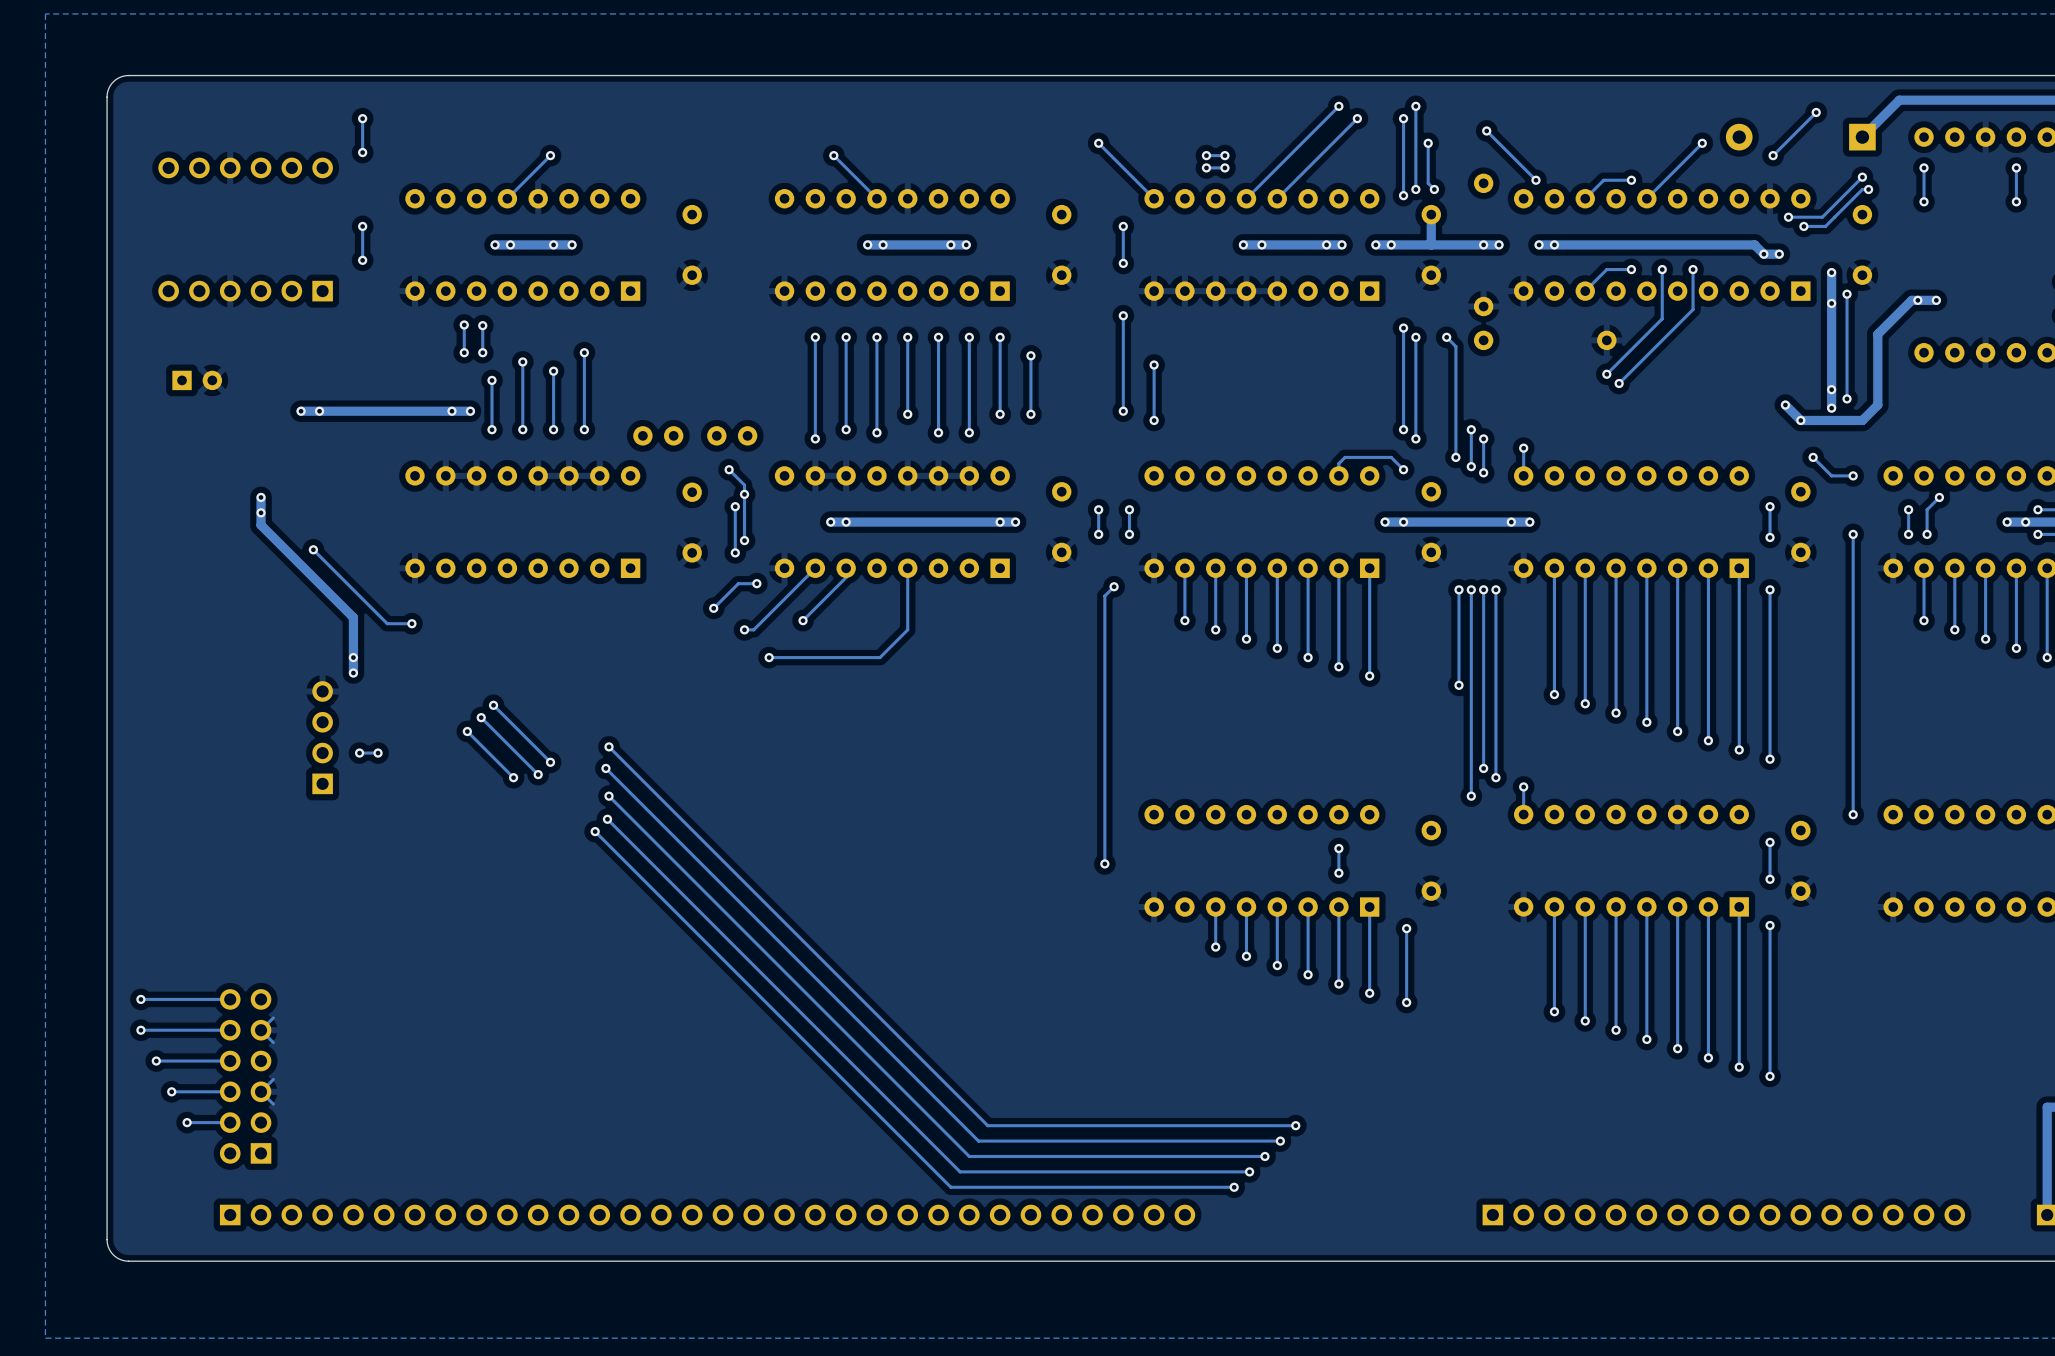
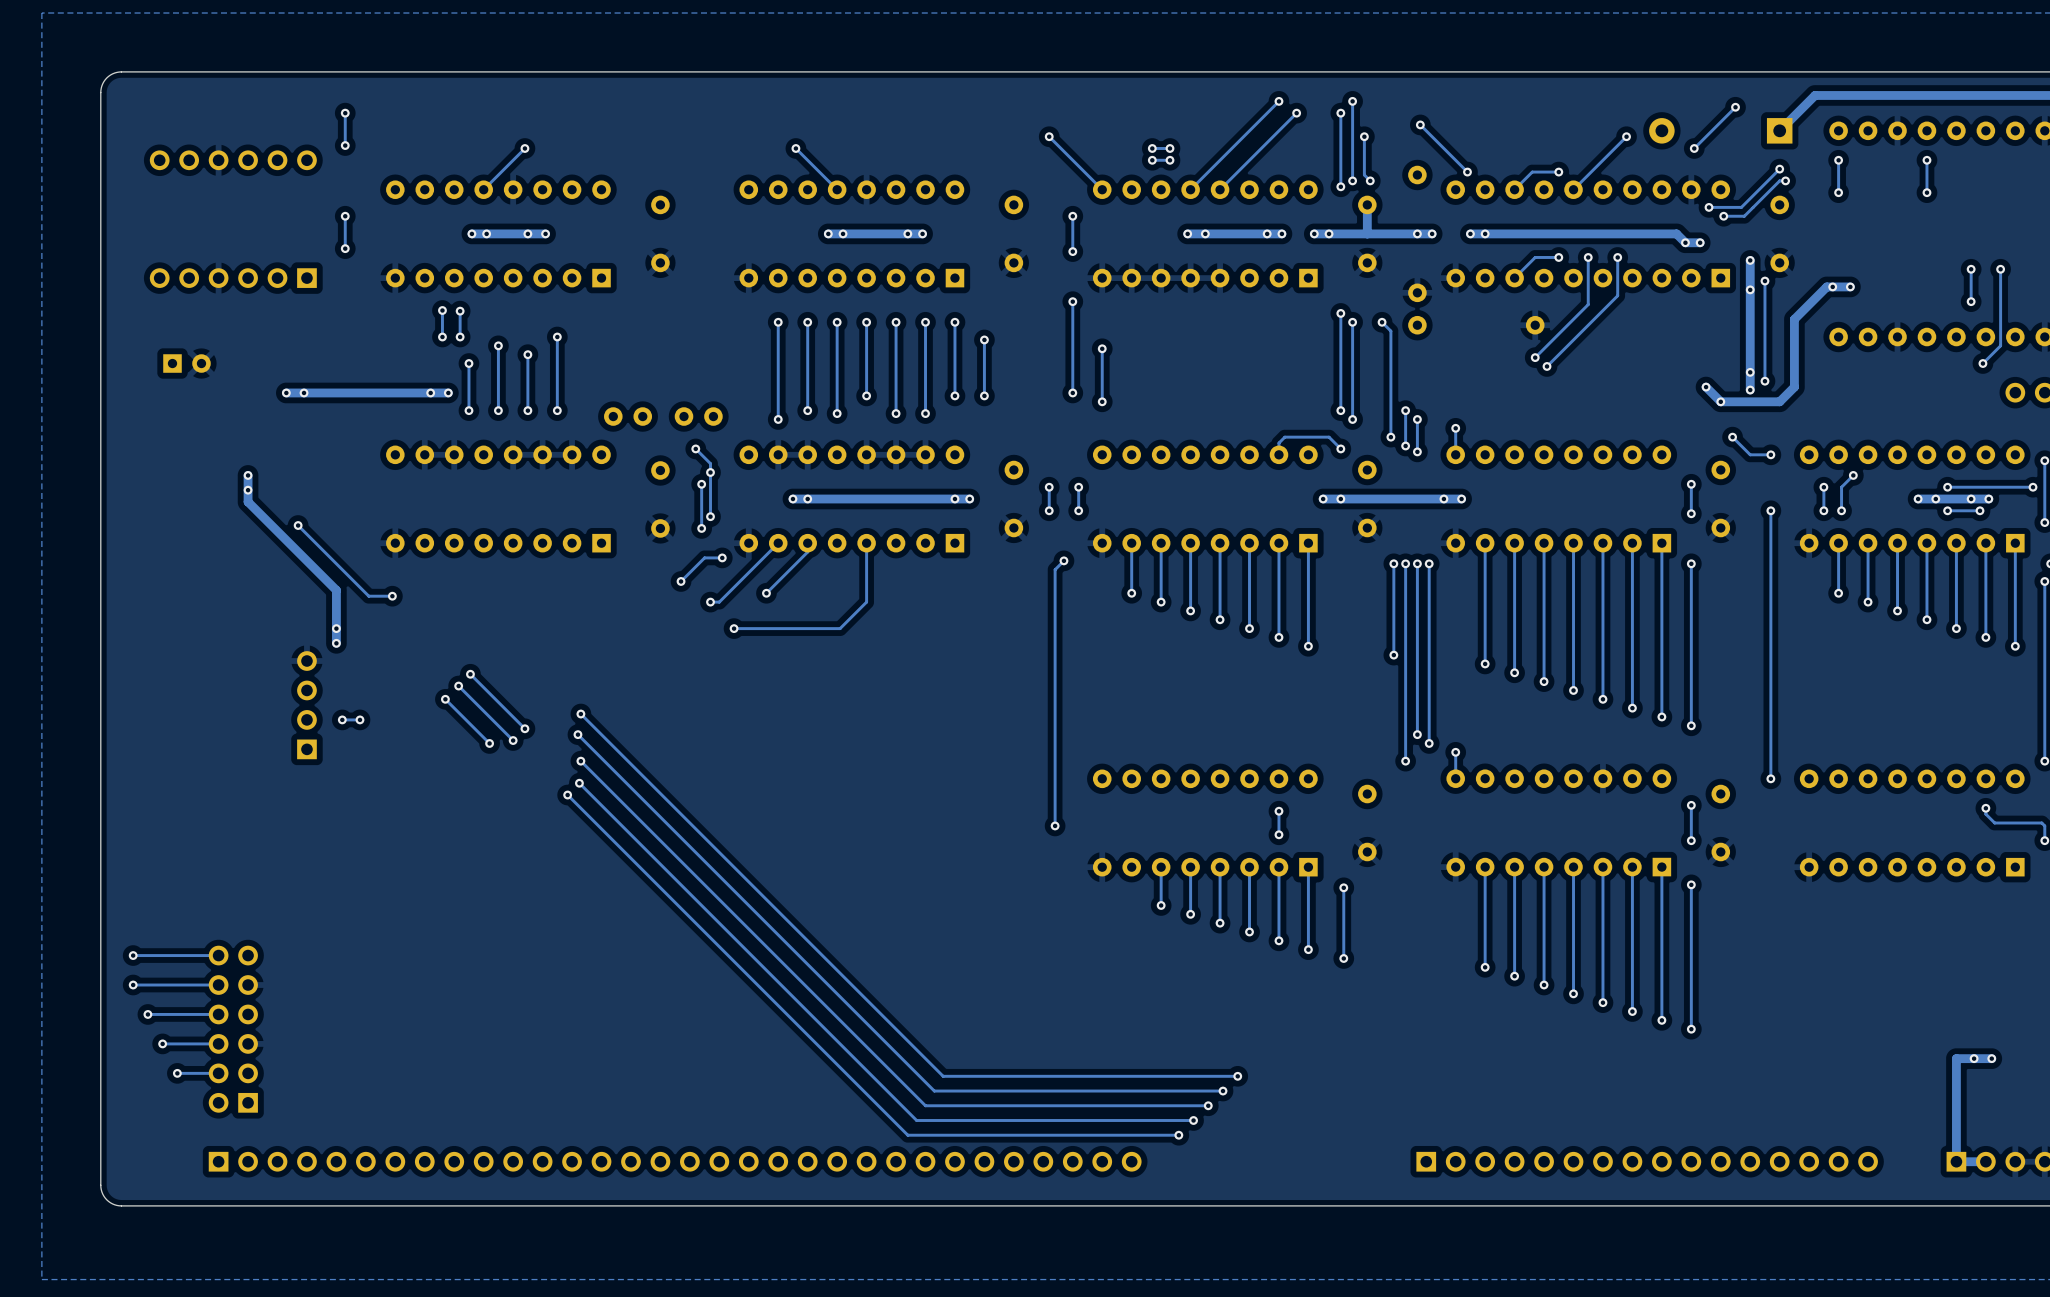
track: (273, 1017) (261, 1030) (273, 1042) -> none
track: (273, 1079) (261, 1091) (273, 1104) -> none

